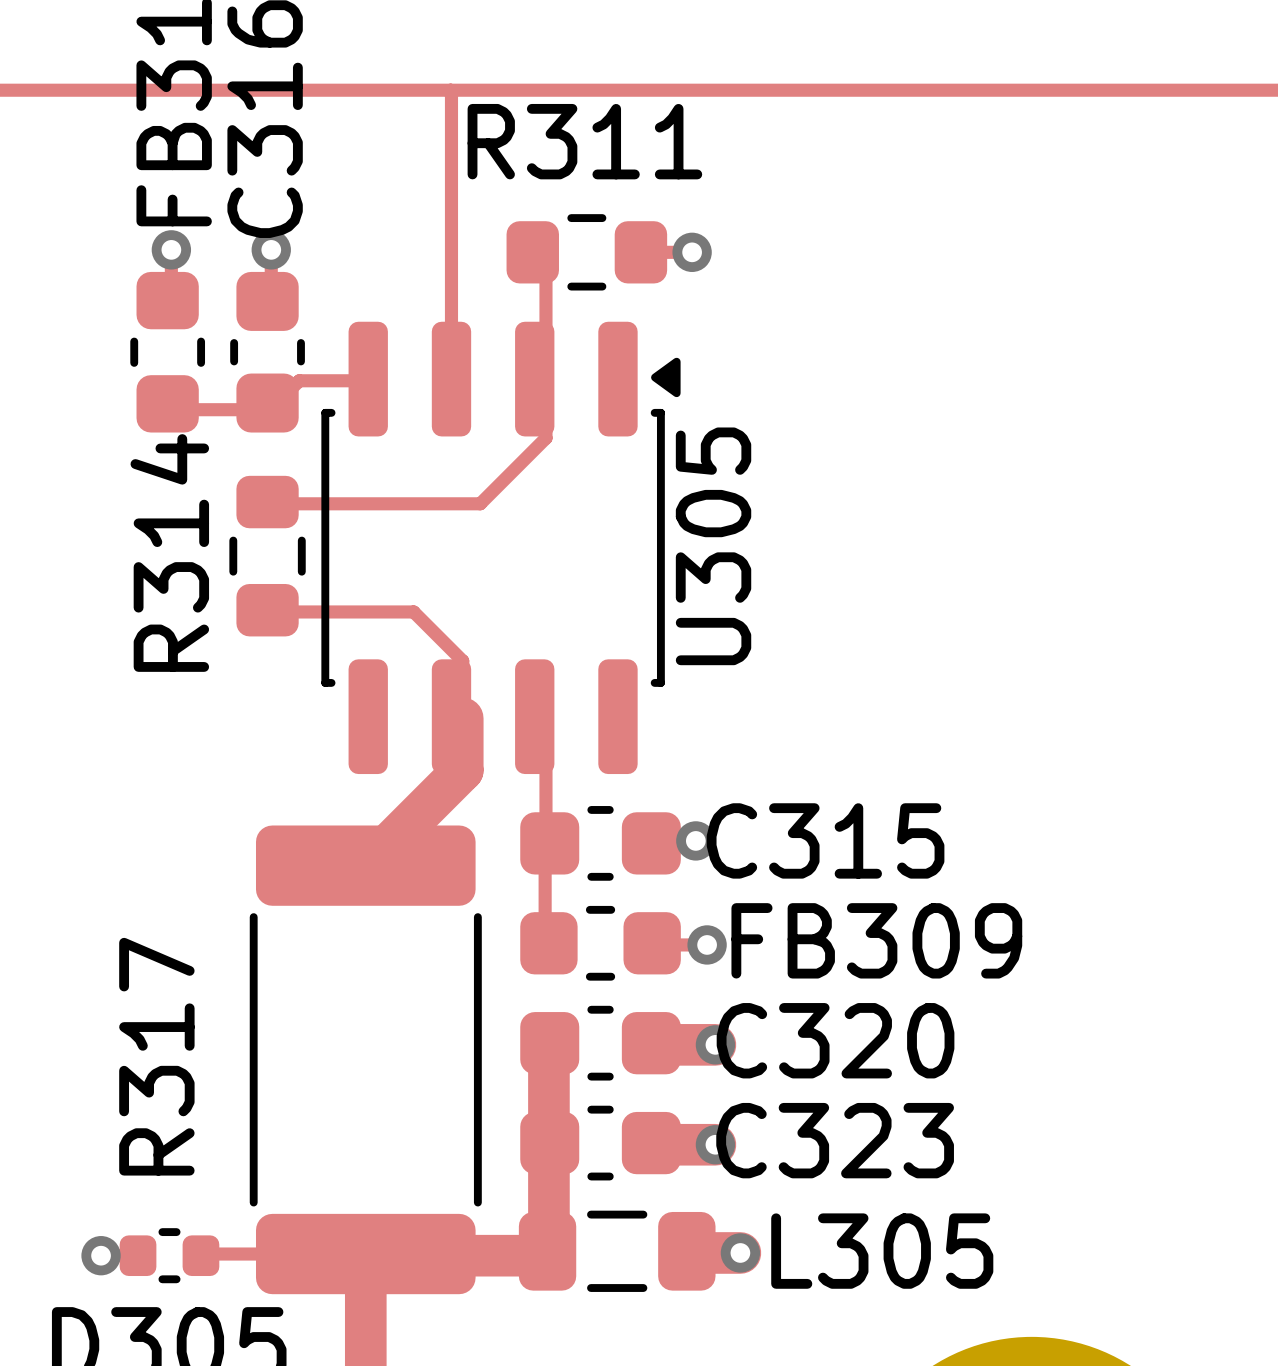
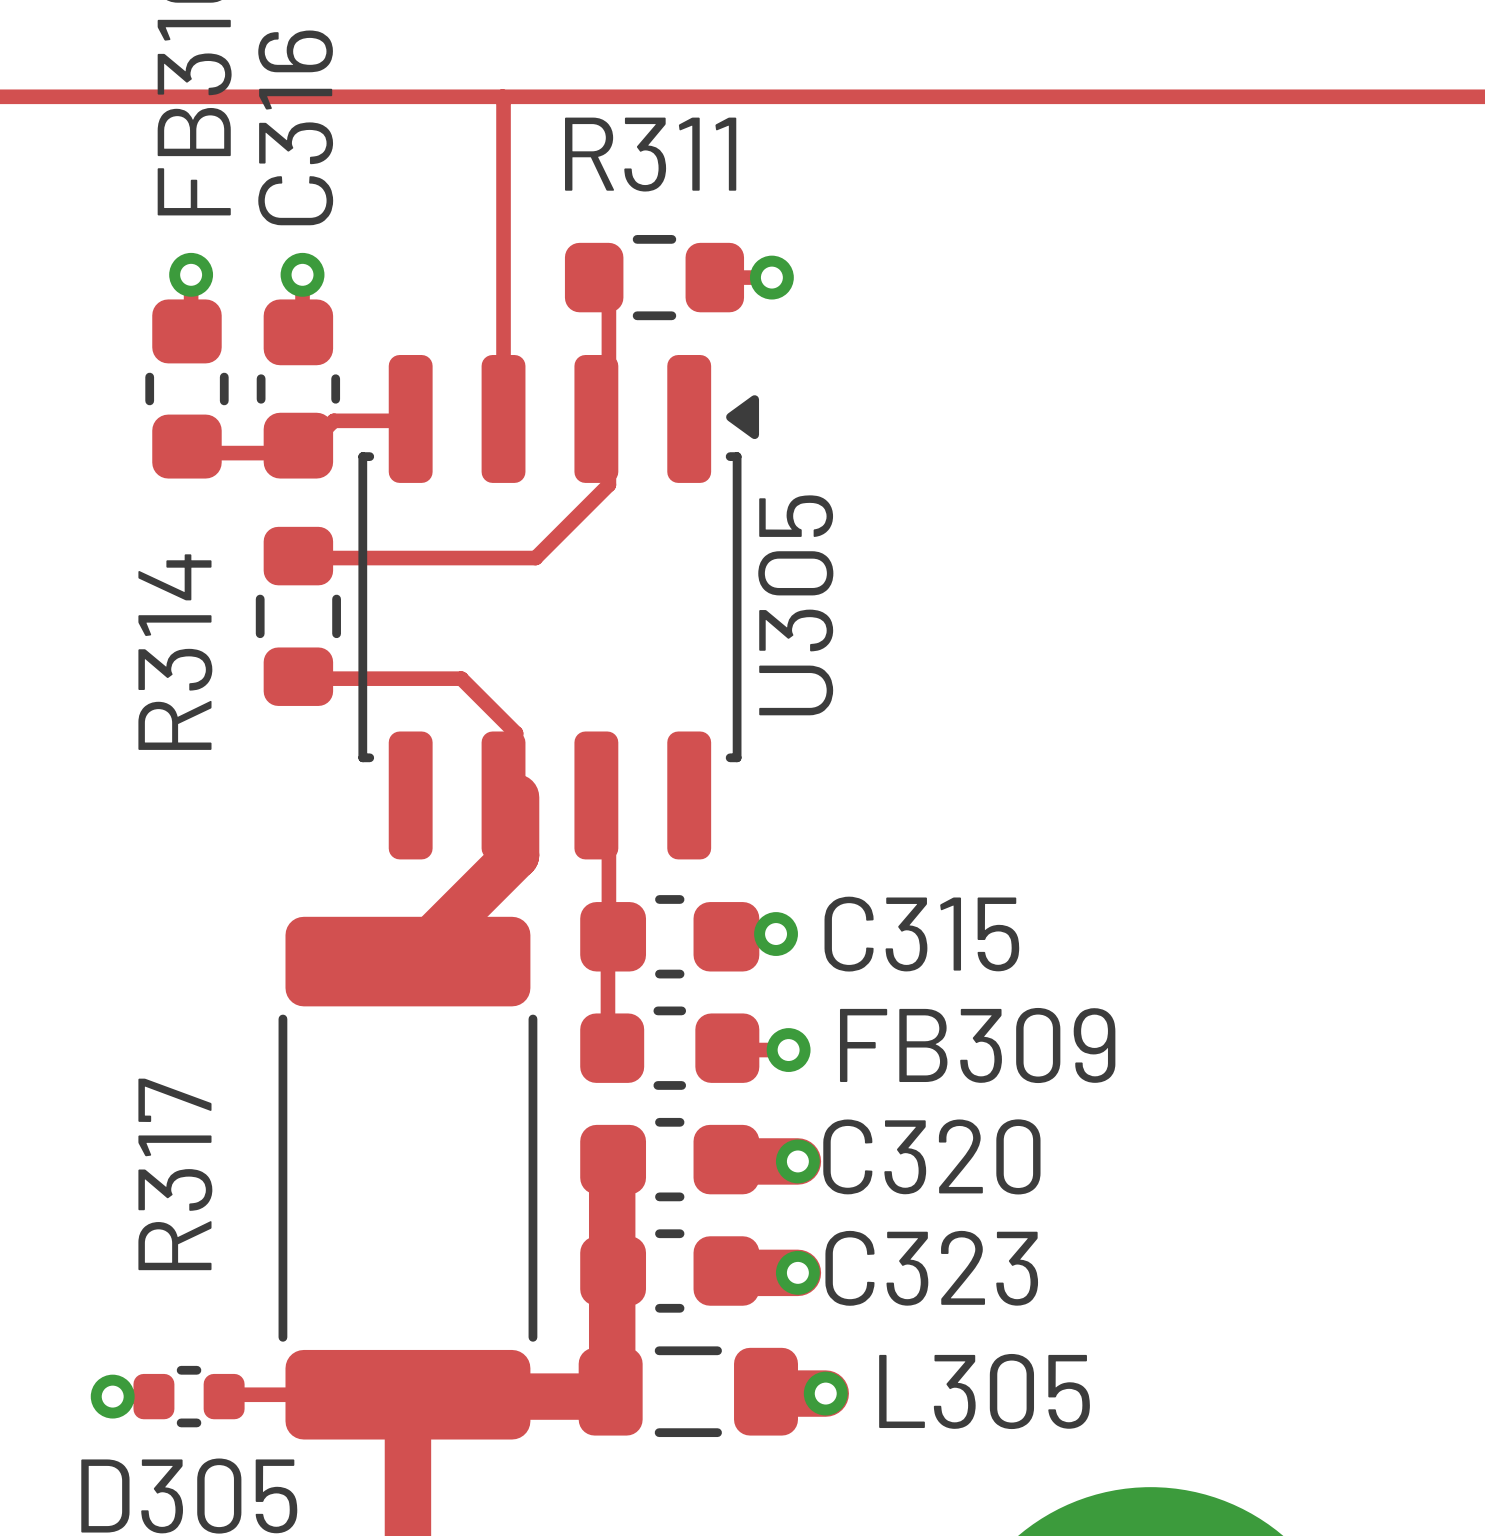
R314 name position: R314 (169, 553) -> R314 (175, 652)

